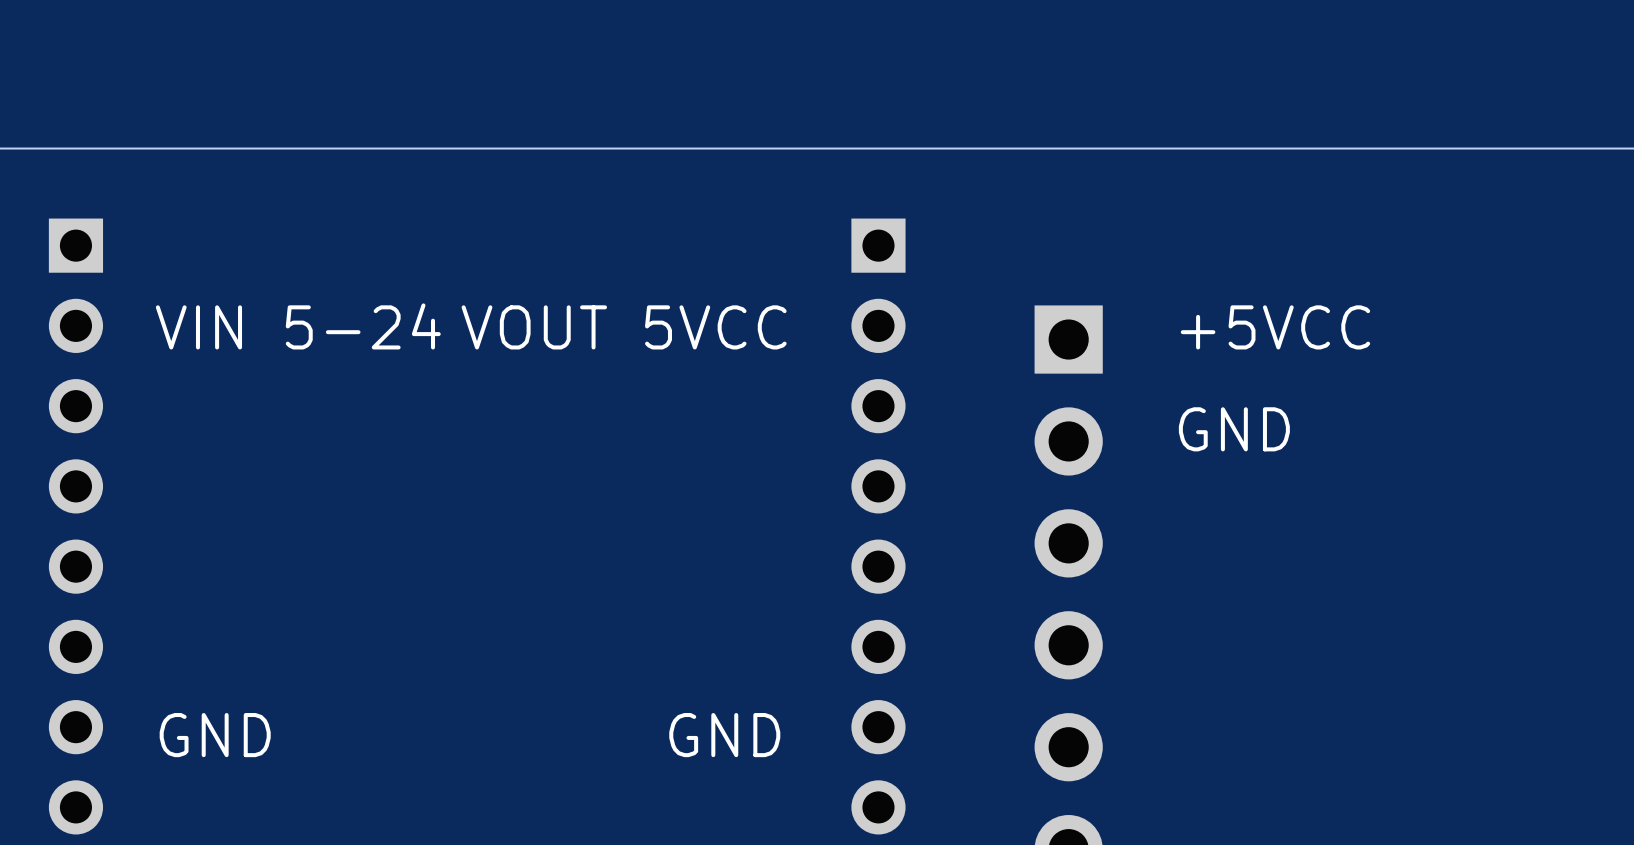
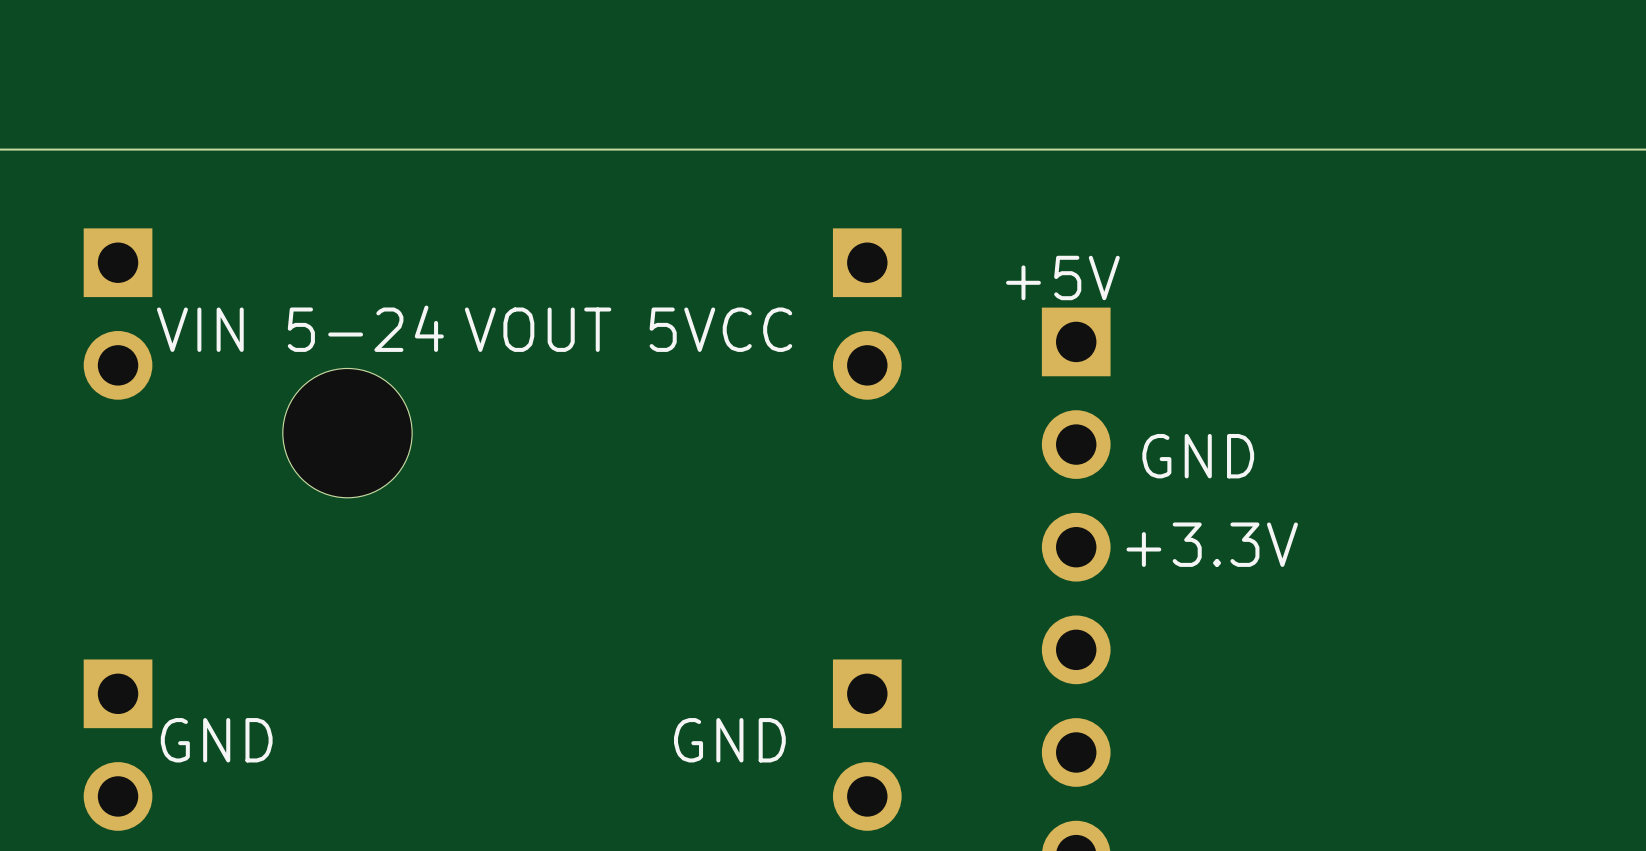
text: none -> +5V (1062, 277)
part: none -> (118, 314)
part: none -> (867, 314)
text: +5VCC (1275, 327) -> none
text position: GND (1234, 429) -> GND (1198, 456)
part: none -> (347, 433)
part: (75, 526) -> none
part: (878, 526) -> none
text: none -> +3.3V (1212, 544)
part: none -> (118, 745)
part: none -> (867, 745)

